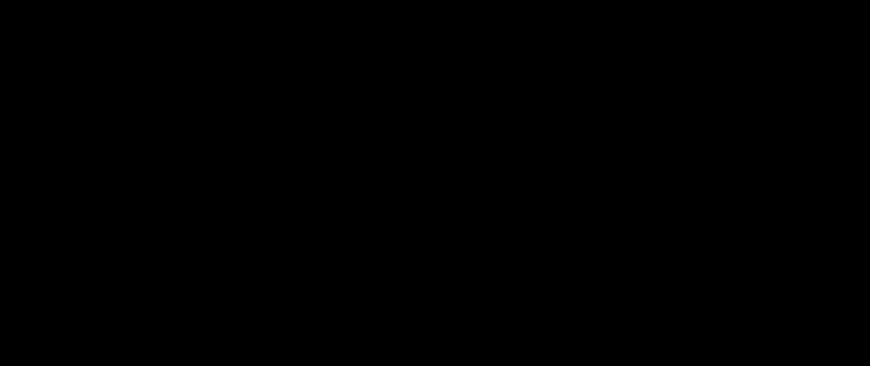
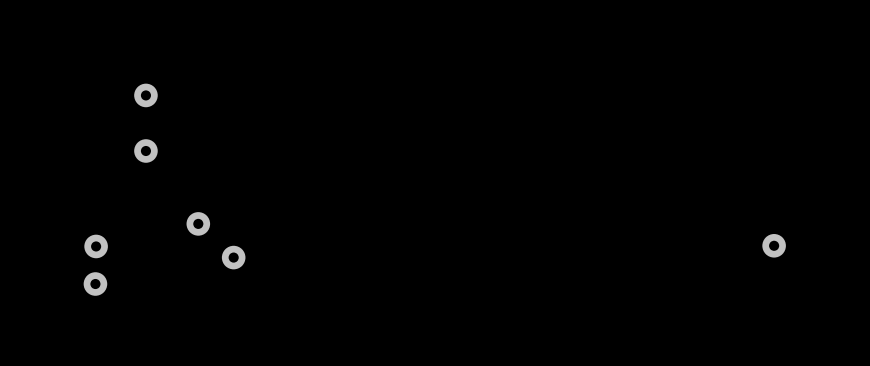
via: none -> (145, 95)
via: none -> (145, 151)
via: none -> (198, 223)
via: none -> (774, 245)
via: none -> (96, 246)
via: none -> (233, 257)
via: none -> (95, 284)

